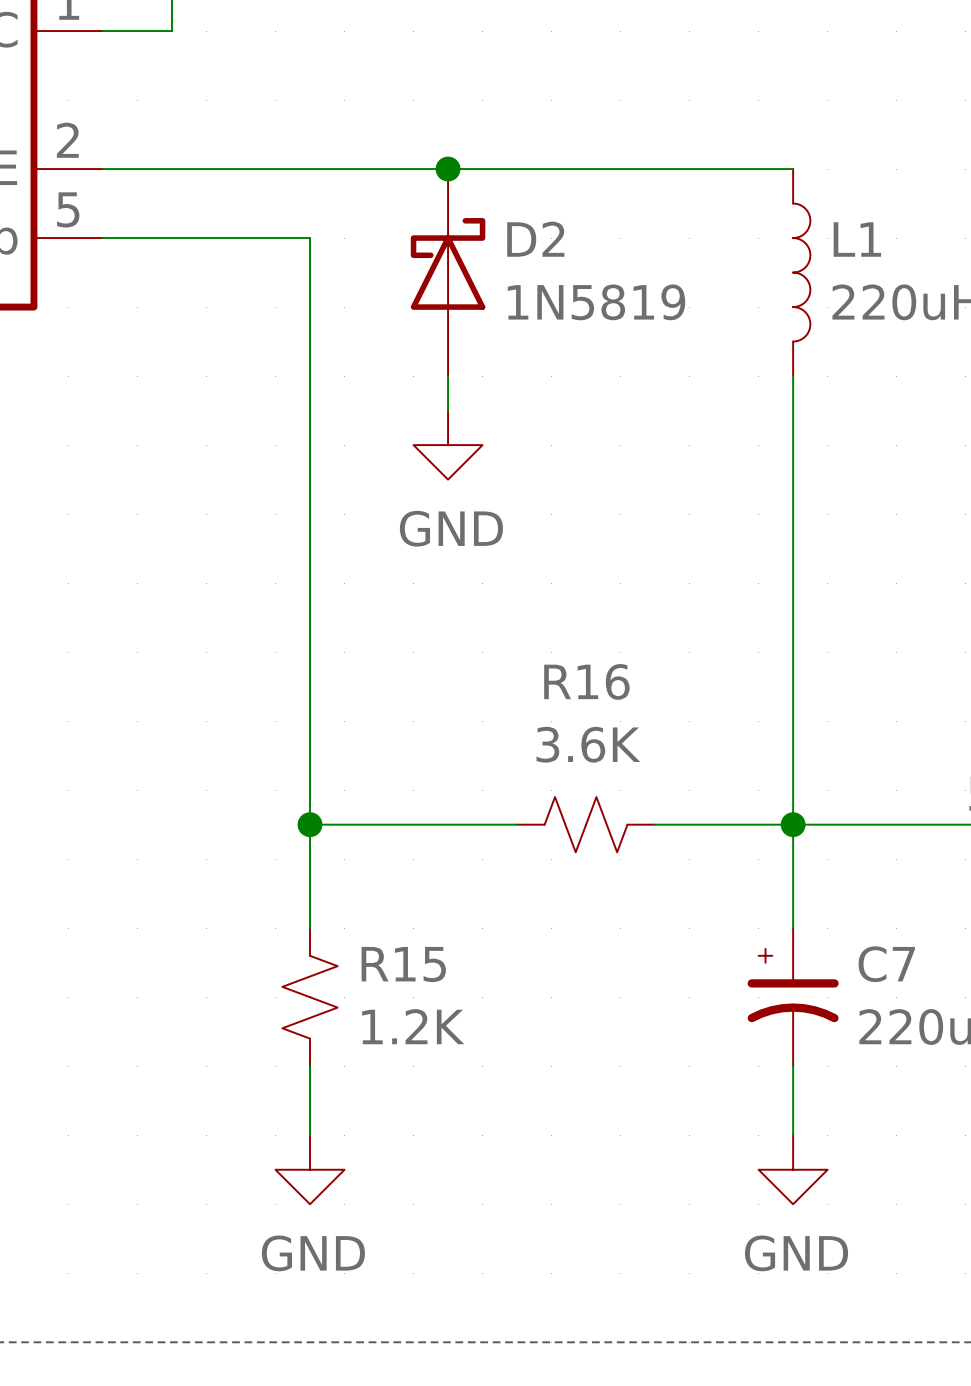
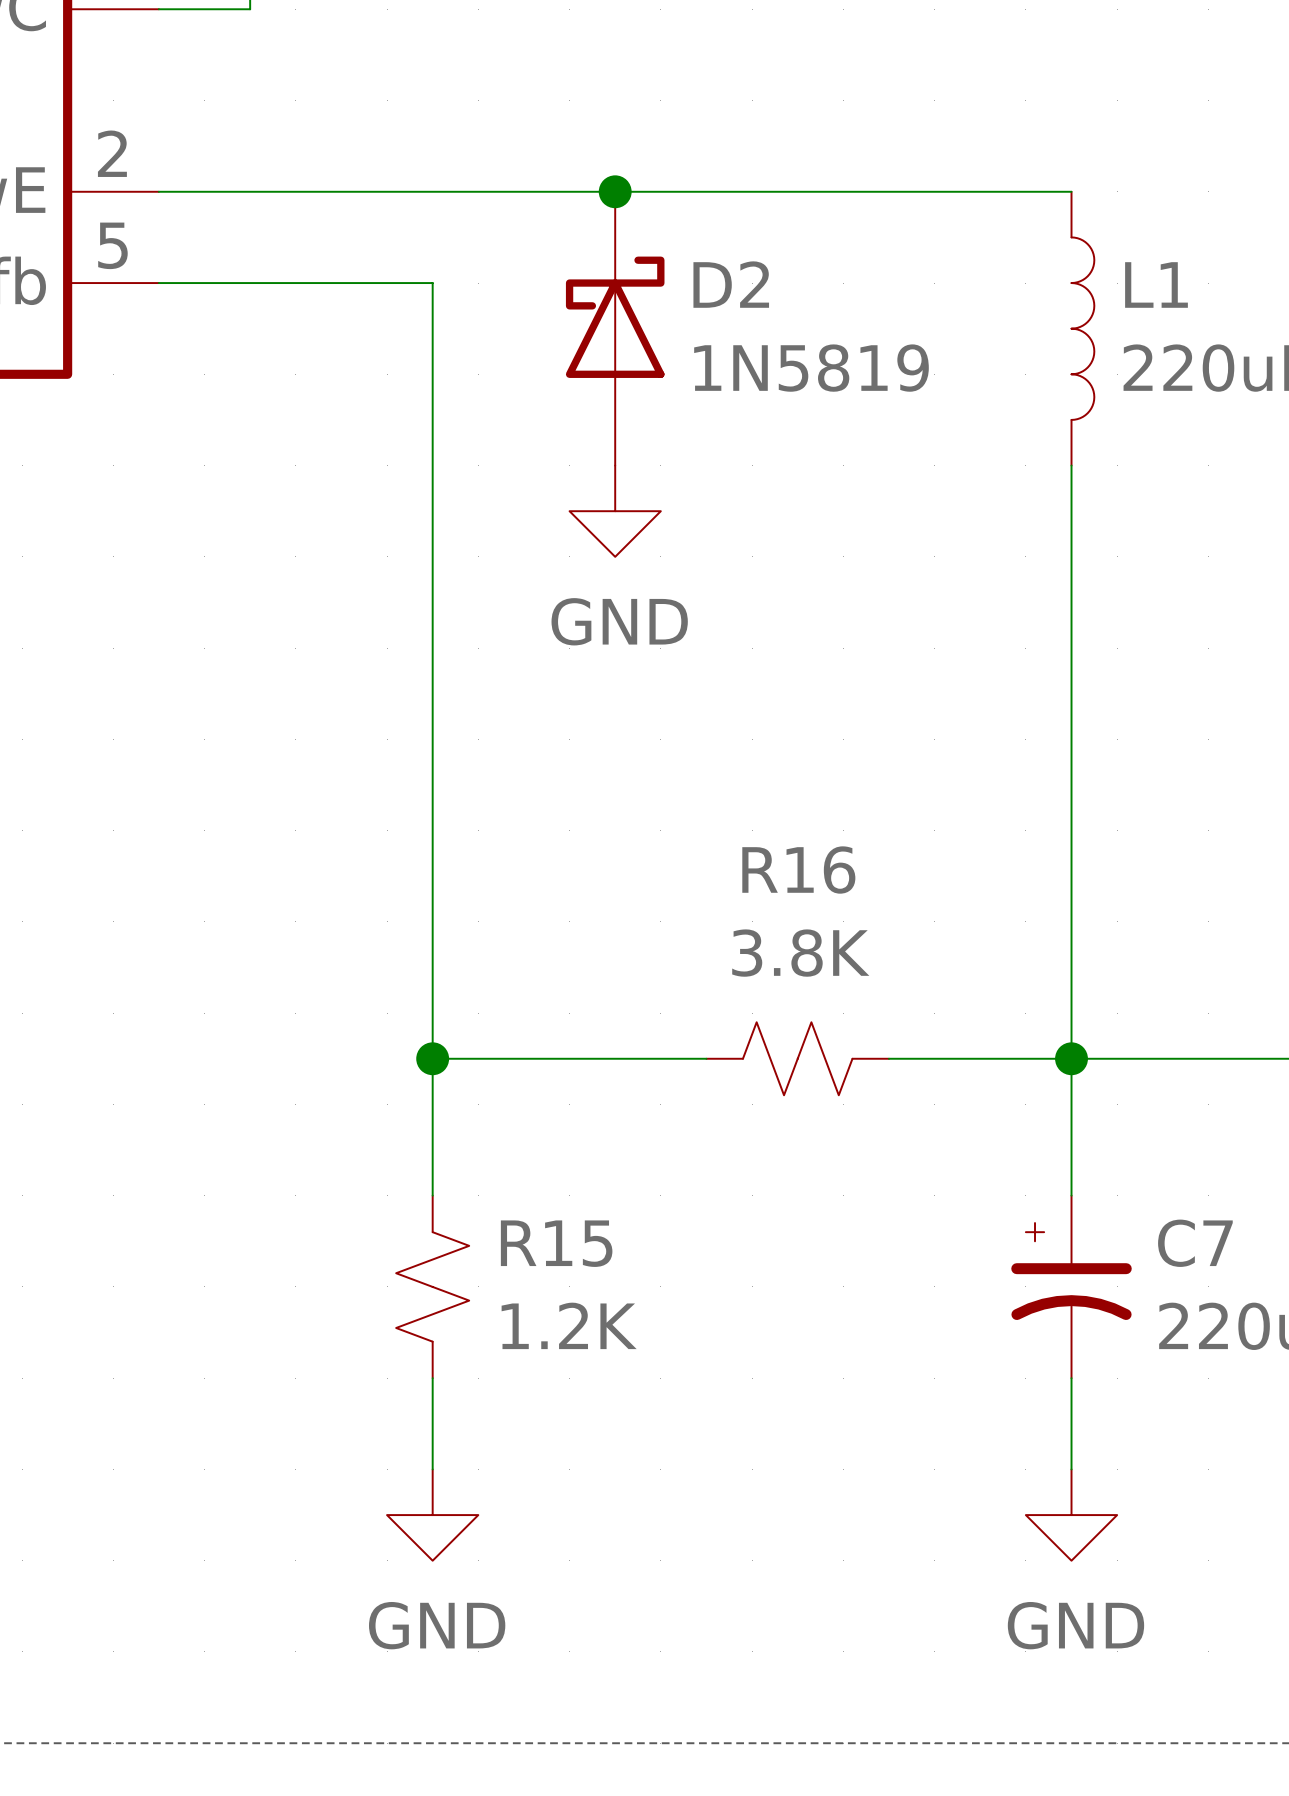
power symbol position: GND (448, 445) -> GND (615, 511)
R16 value: 3.6K (588, 744) -> 3.8K (800, 953)

